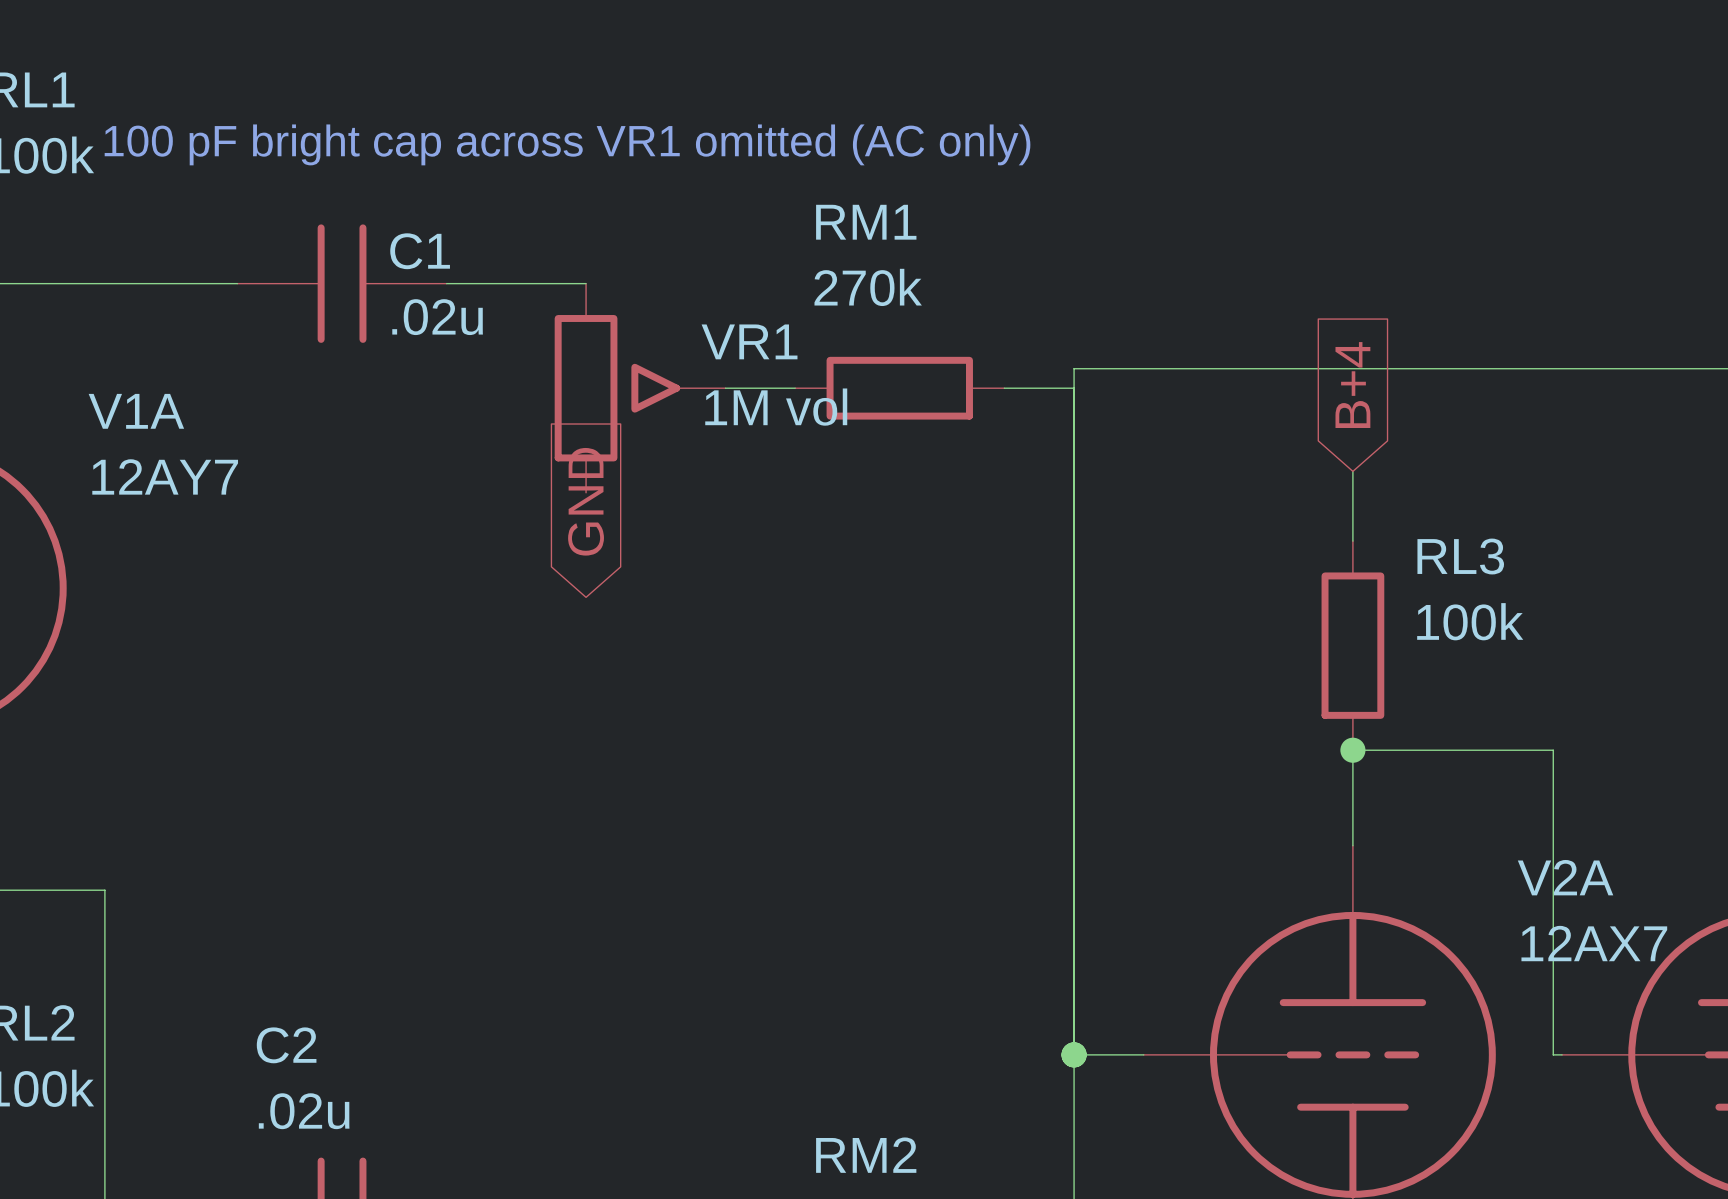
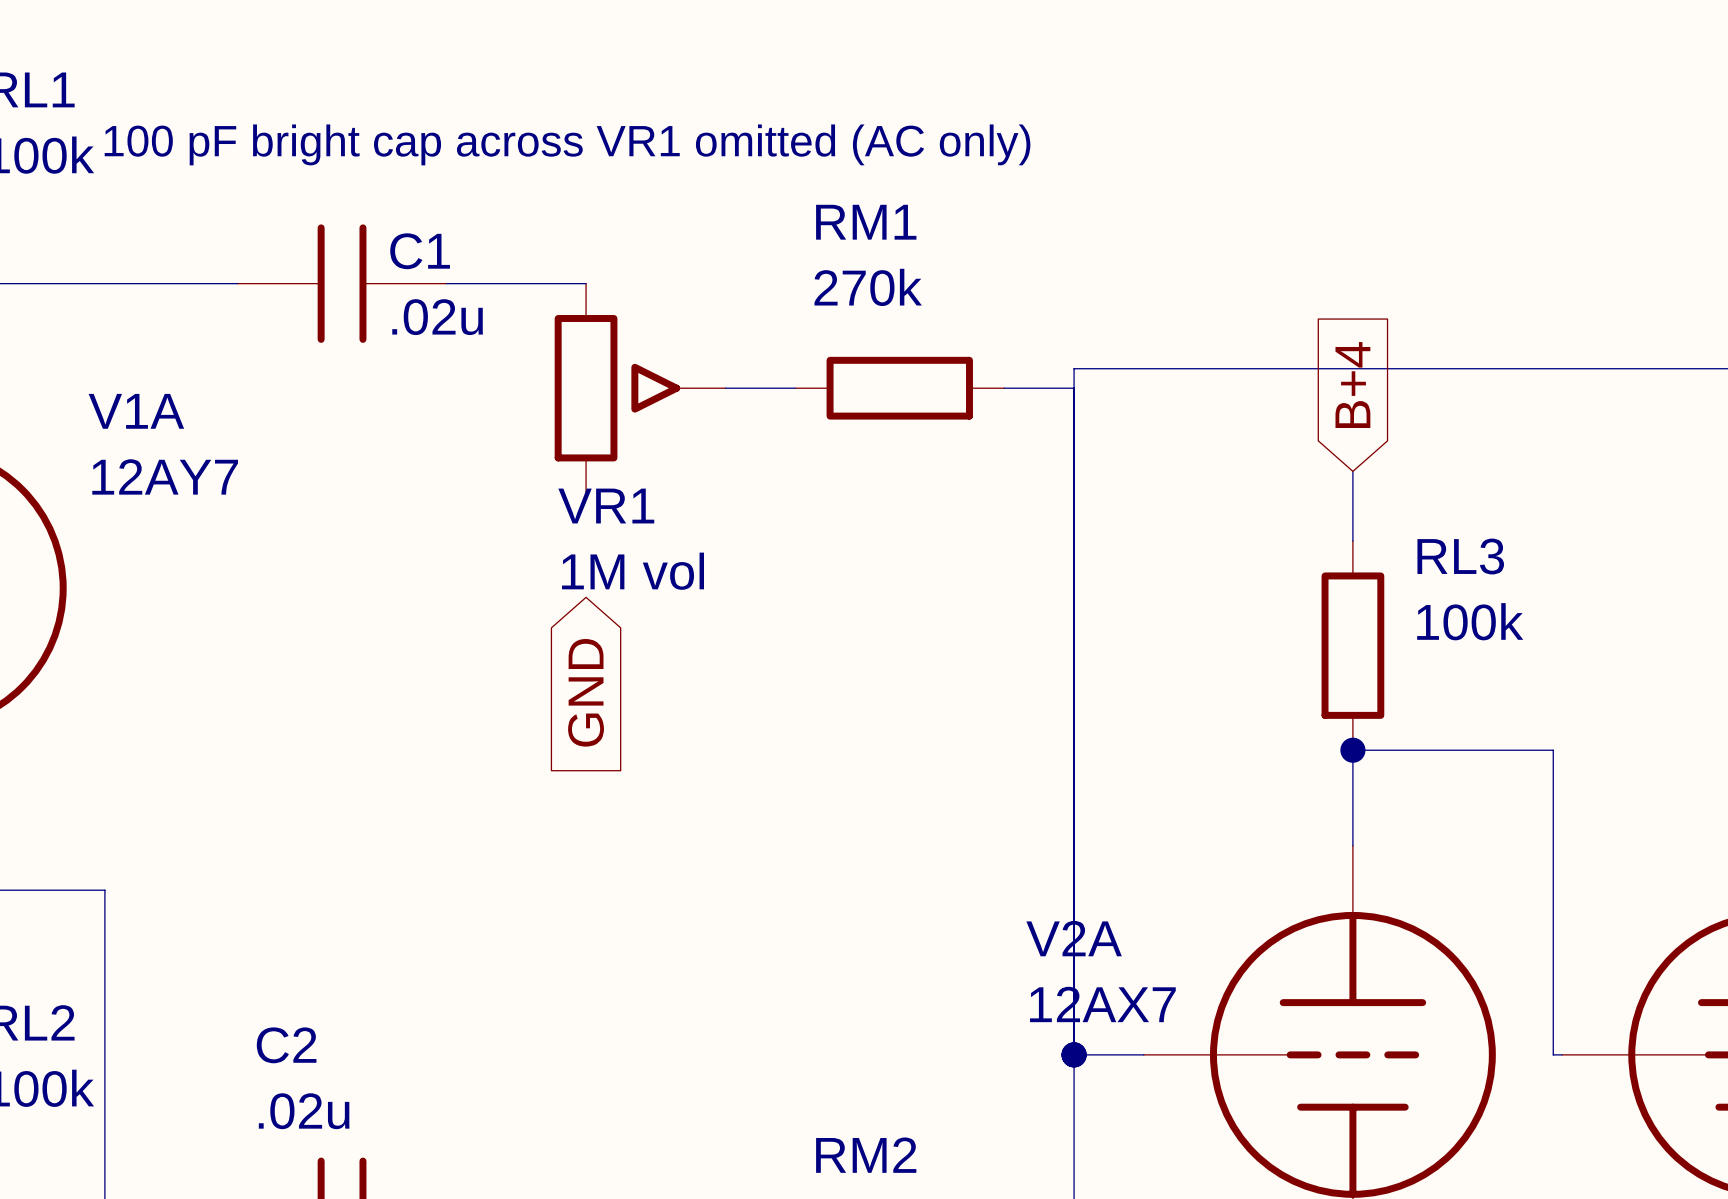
VR1 name position: VR1 (749, 341) -> VR1 (606, 506)
VR1 value position: 1M vol (776, 407) -> 1M vol (633, 571)
global label rotation: 0° (586, 501) -> 180° (586, 692)
V2A name position: V2A (1565, 877) -> V2A (1074, 938)
V2A value position: 12AX7 (1594, 943) -> 12AX7 (1102, 1004)

